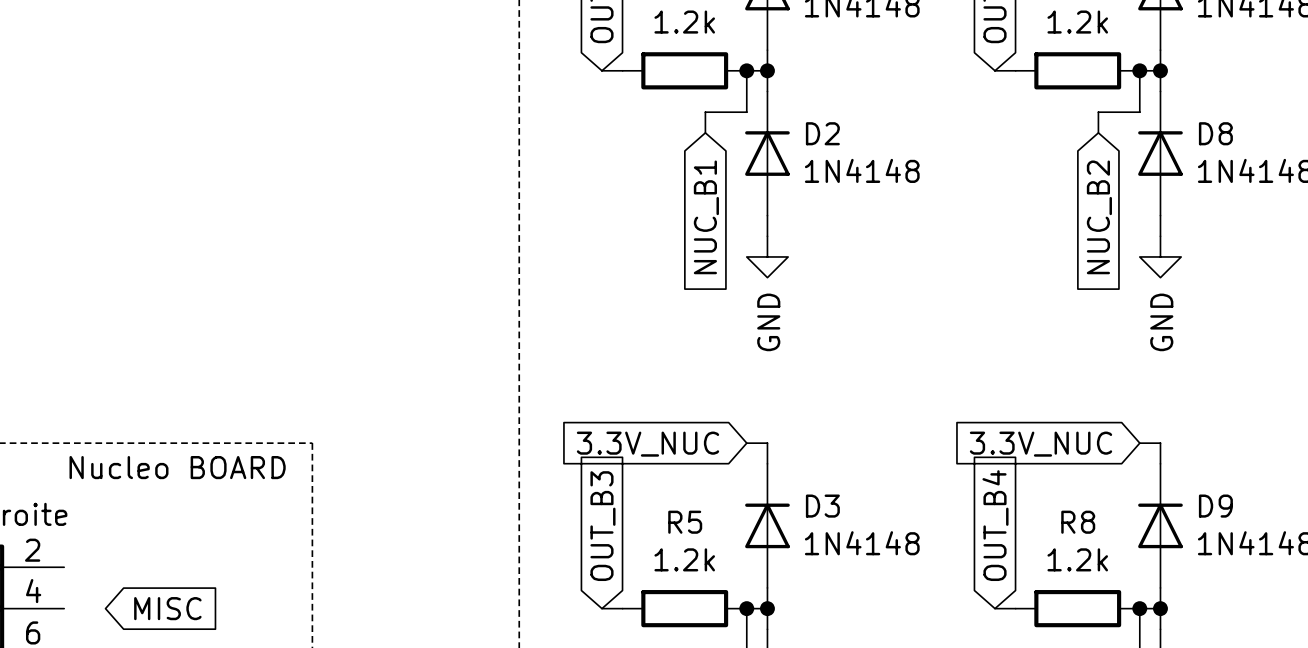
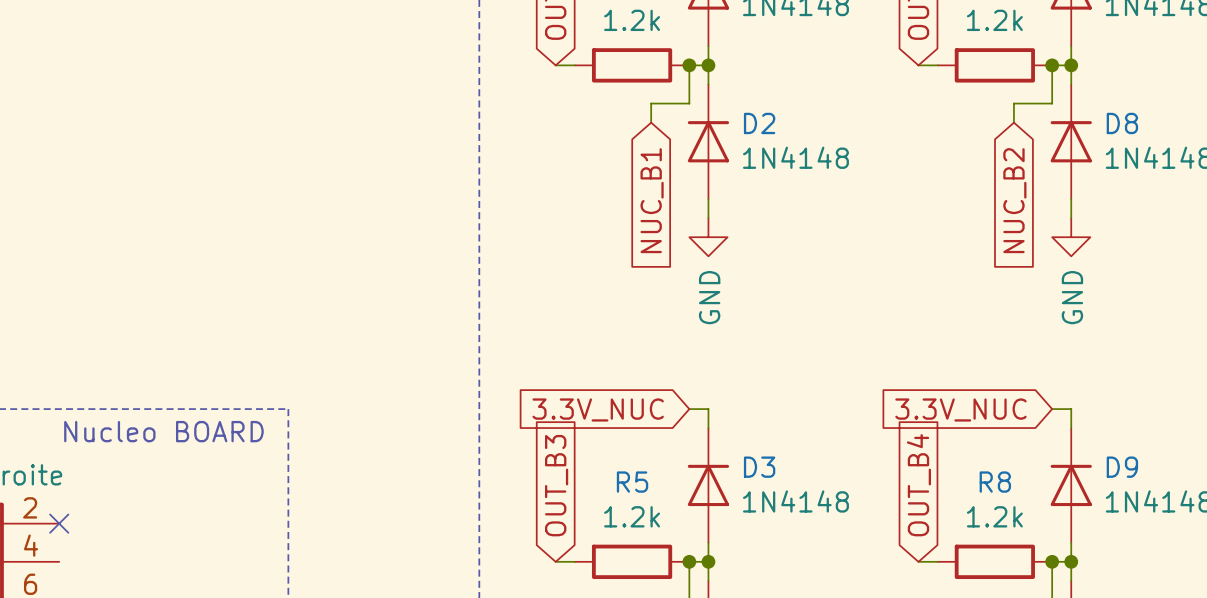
no-connect mark: none -> (59, 523)
global label: MISC (167, 608) -> none

